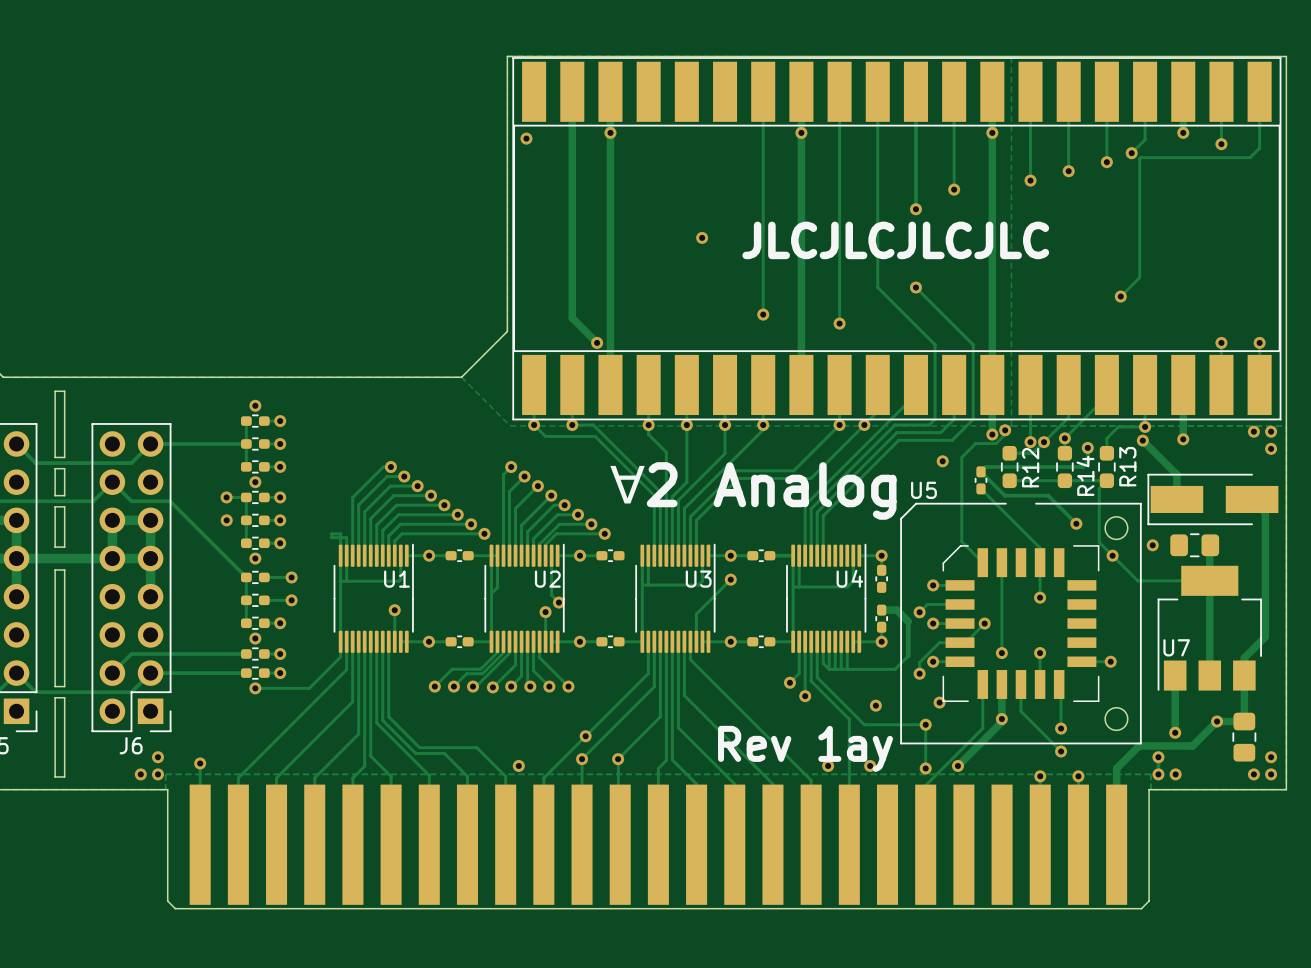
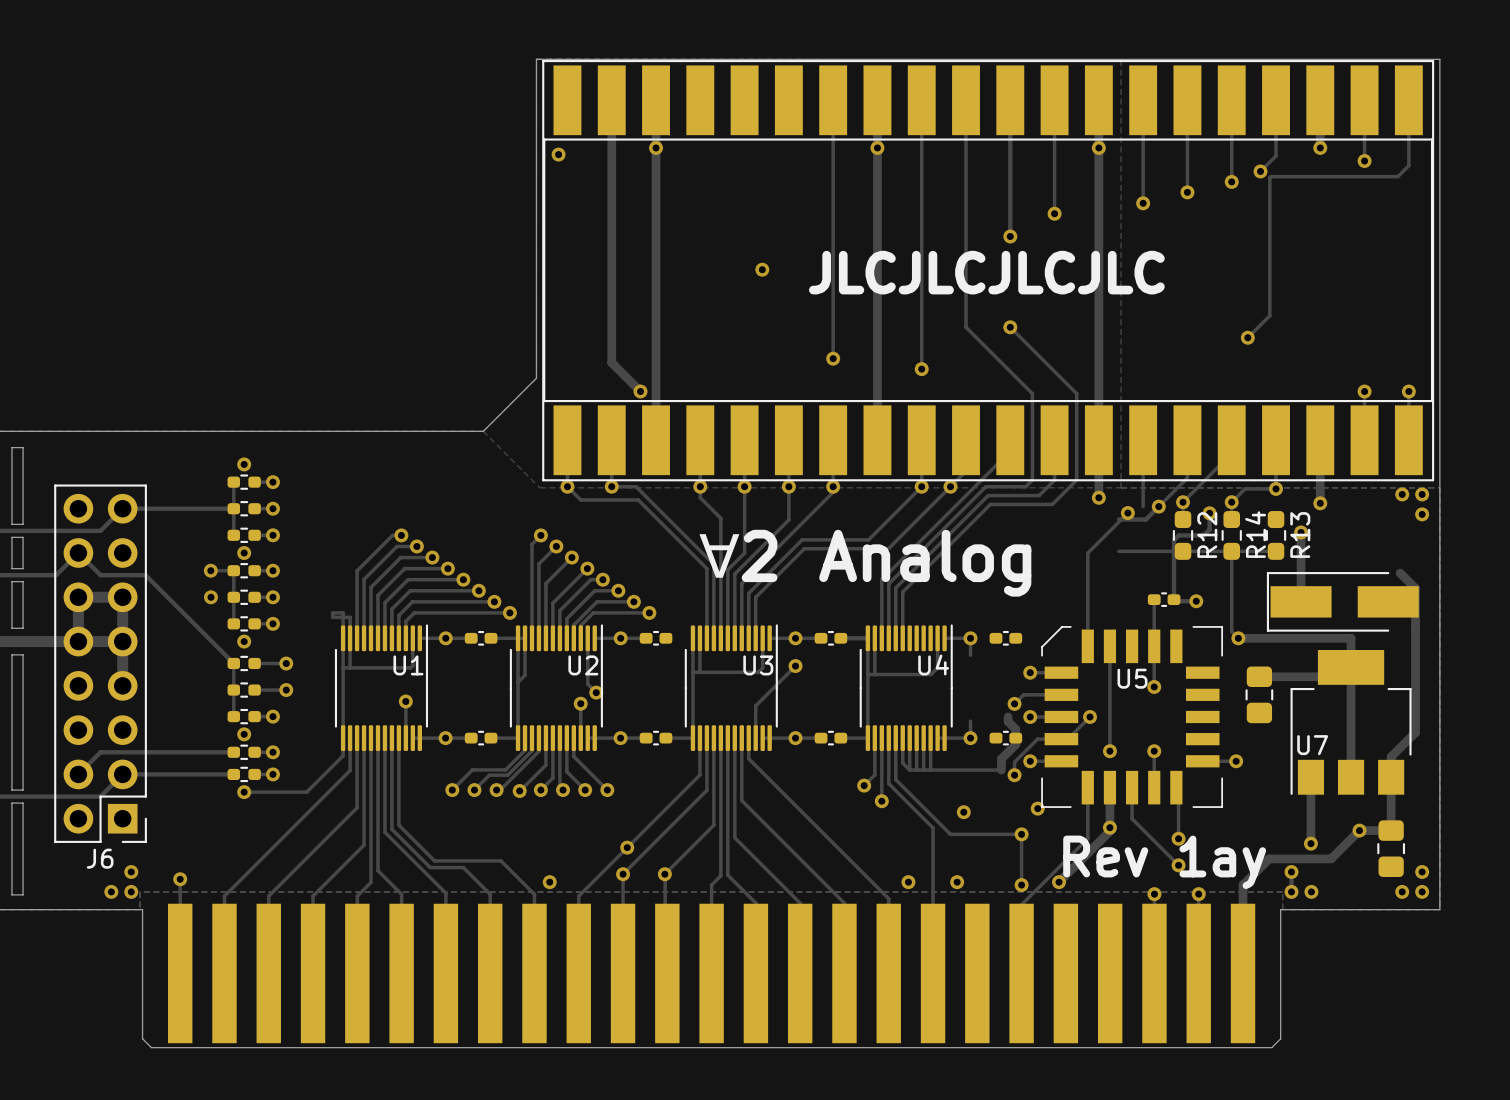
track: (1005, 430) (1005, 434) (996, 443) (975, 443) (961, 457) (961, 541) (982, 562) -> (1127, 513) (1087, 553) (1087, 646)
via: (1005, 430) -> none
via: none -> (1231, 502)
track: (1142, 440) (1176, 474) (1176, 499) -> none
via: (1142, 440) -> none
via: (1030, 442) -> none
via: none -> (1127, 513)
via: (942, 461) -> none
track: none -> (1301, 532) (1301, 601)
via: none -> (1301, 532)
R13 name: R13 (1127, 466) -> R14 (1255, 534)
R12: (1009, 467) -> none
track: (1061, 467) (985, 467) (981, 471) (1004, 495) (1048, 495) (1076, 523) -> (1178, 535) (1174, 540) (1174, 599) (1196, 601)
R13: none -> (1276, 535)
R14 name: R14 (1085, 475) -> R12 (1207, 535)
part: (981, 480) -> none
track: (1106, 480) (1099, 488) (1099, 542) (1106, 549) -> (1276, 551) (1231, 551) (1231, 631)
text position: ∀2 (642, 484) -> ∀2 (736, 555)
track: (981, 488) (1040, 547) -> (1154, 599) (1154, 629)
text position: Analog (805, 490) -> Analog (925, 563)
U5 name position: U5 (923, 490) -> U5 (1132, 678)
part position: (1212, 499) -> (1342, 601)
U5 footprint: [900, 502, 1142, 745] -> [1041, 626, 1224, 808]
part: none -> (1164, 599)
via: (1152, 545) -> none
part rotation: 0° (1194, 545) -> 90° clockwise (1259, 694)
part position: (1194, 545) -> (1259, 694)
part: none -> (1005, 638)
track: (1112, 555) (1137, 580) (1209, 580) -> (1238, 638) (1351, 638)
part: (881, 578) -> none
track: none -> (1259, 676) (1351, 676)
track: (881, 610) (896, 610) (908, 621) (908, 656) (895, 669) -> (1008, 716) (1008, 721) (1015, 729) (1015, 744) (1001, 758) (1001, 770) (986, 770)
part: (881, 618) -> none
part: none -> (1005, 738)
text position: Rev 1ay (805, 748) -> Rev 1ay (1164, 862)

